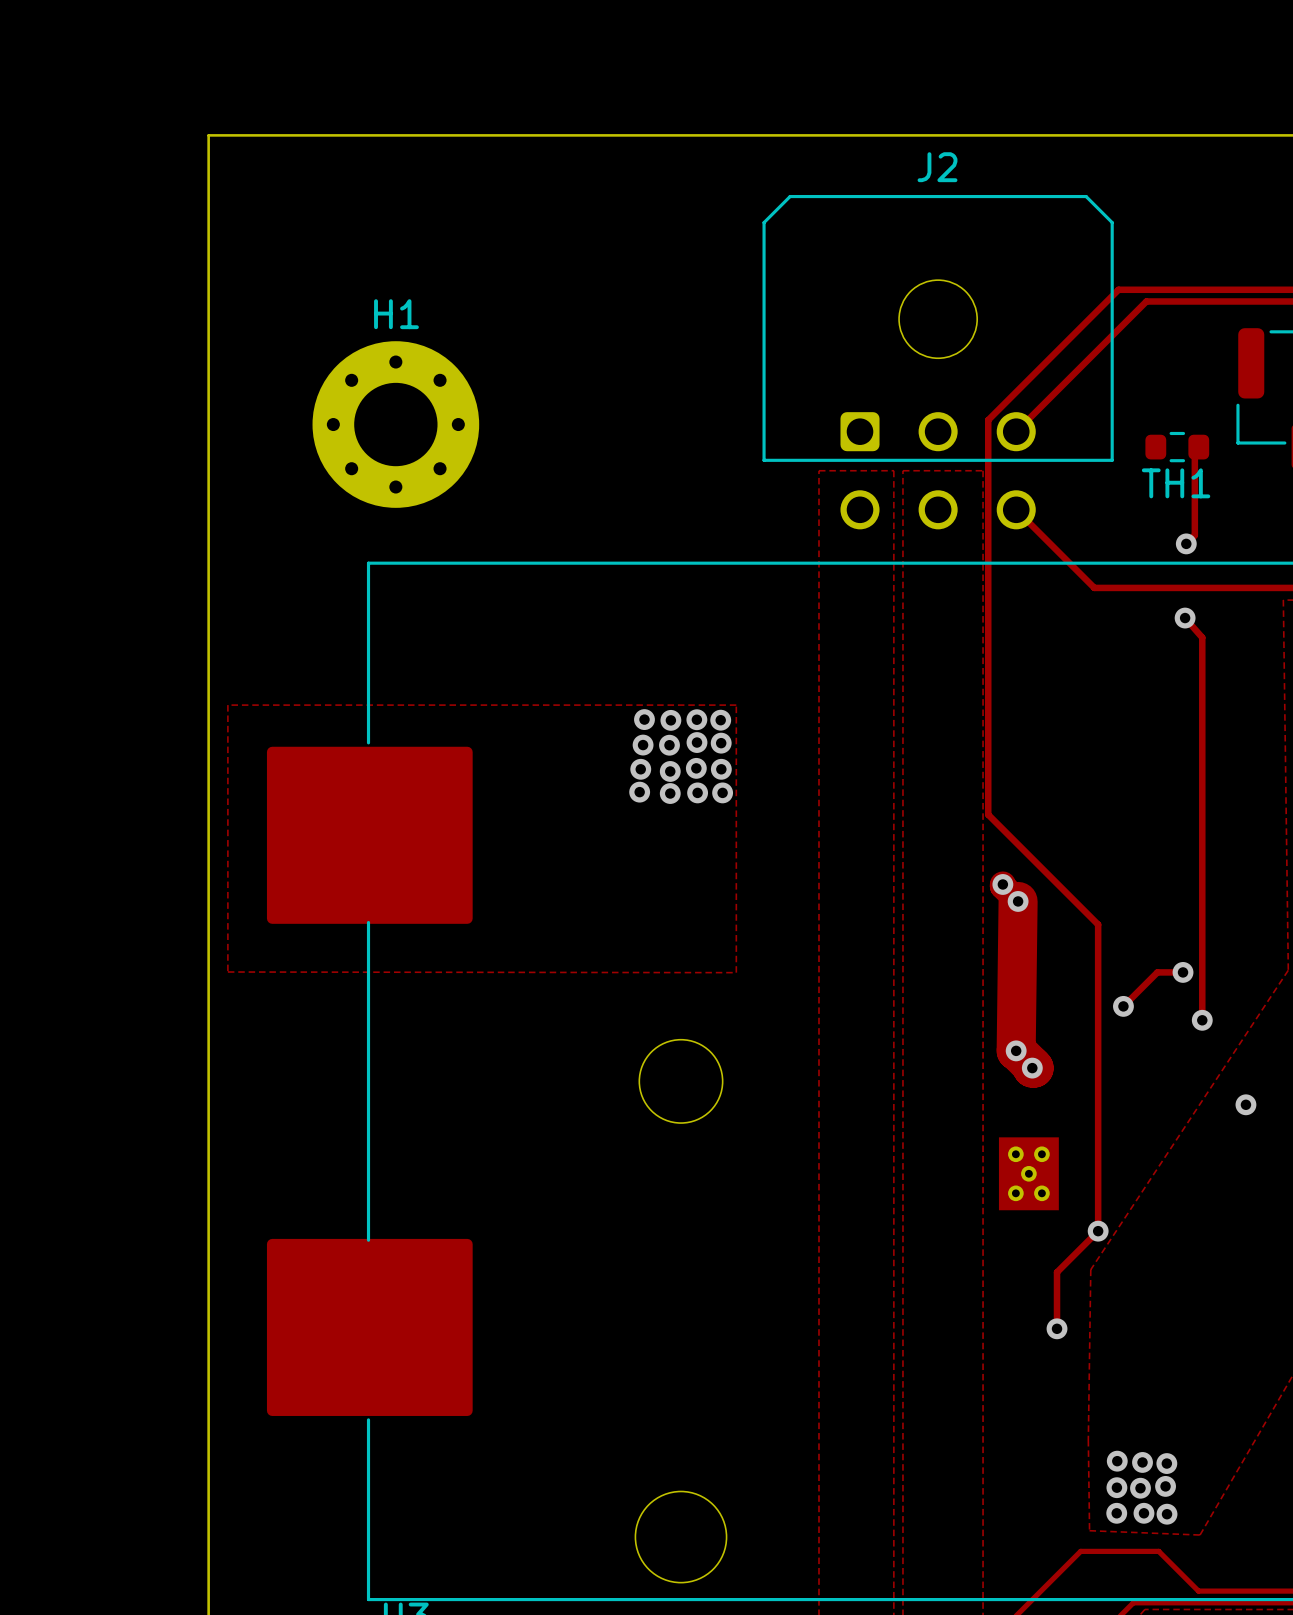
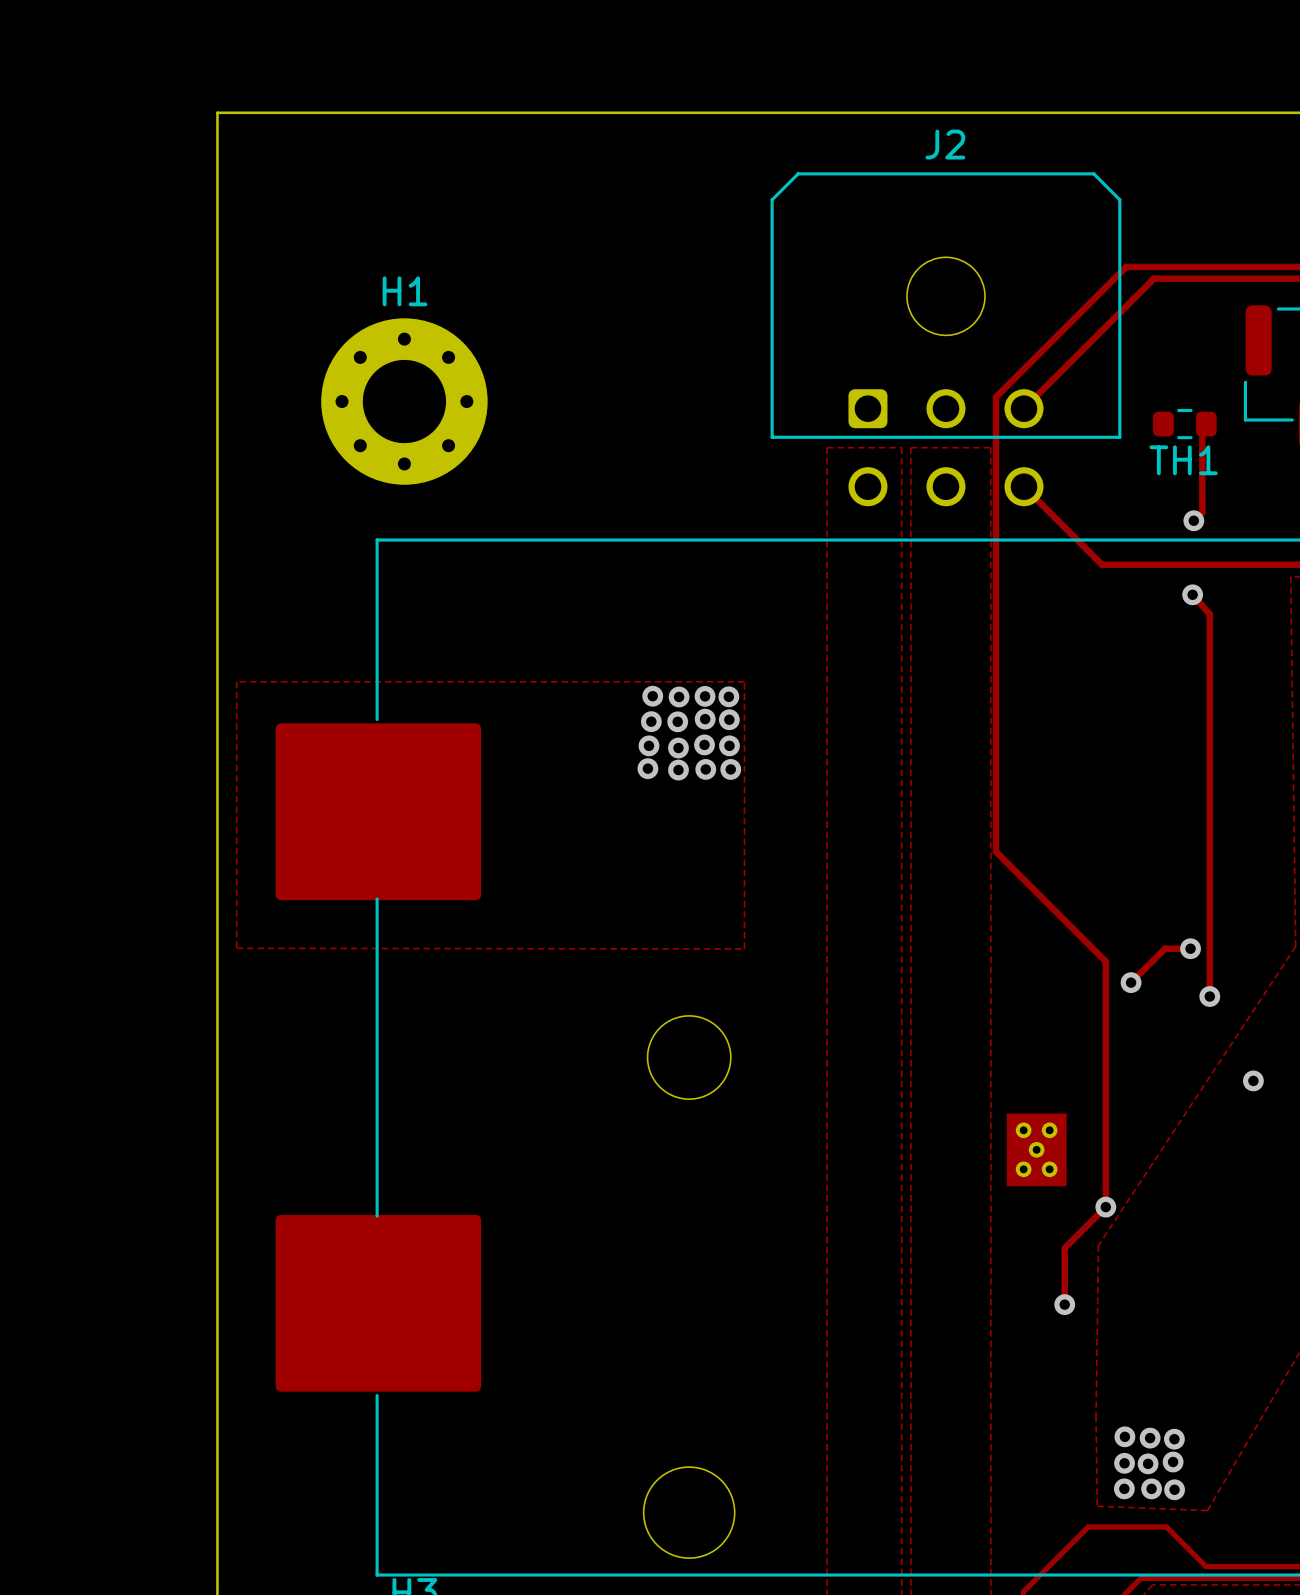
track: (988, 814) (1098, 924) (1098, 985) -> (996, 791) (996, 851) (1105, 961)
track: (1002, 884) (1018, 901) (1016, 1050) (1018, 1052) (1034, 1068) (1032, 1066) -> none
via: (1002, 884) -> none
via: (1018, 901) -> none
via: (1016, 1050) -> none
via: (1032, 1068) -> none

